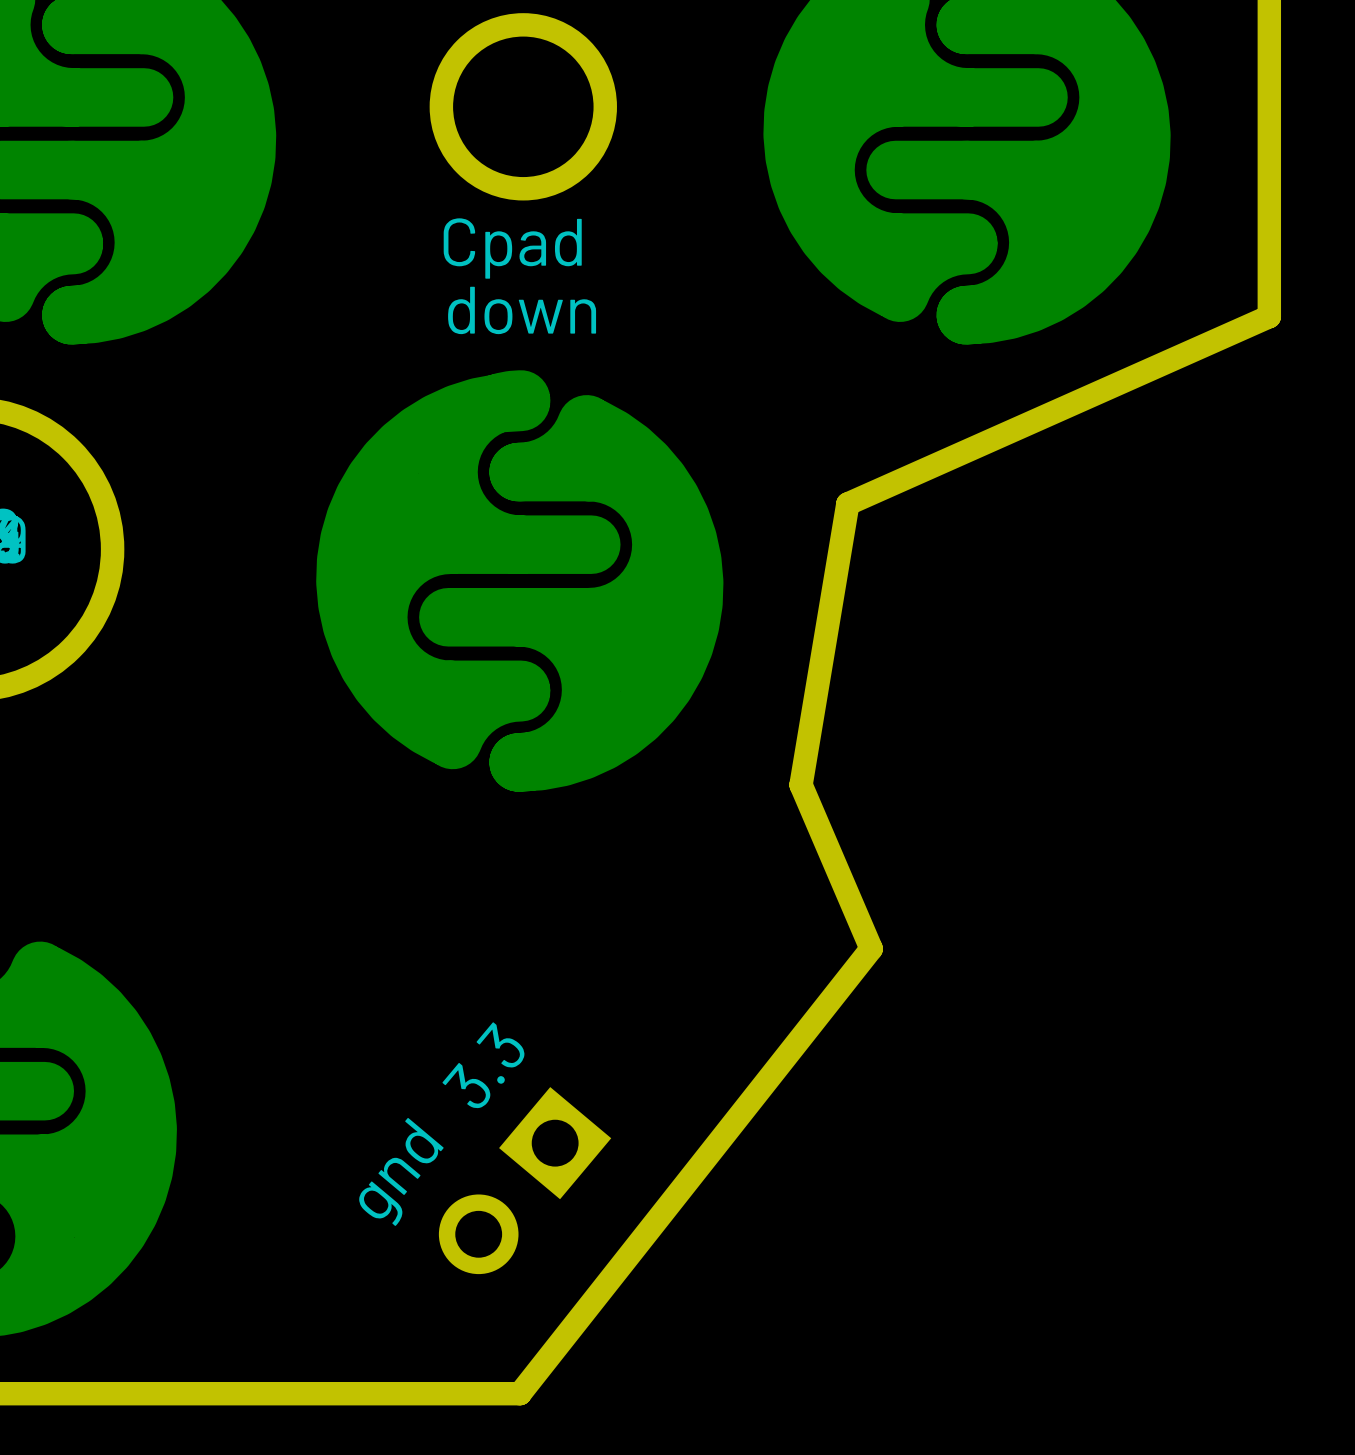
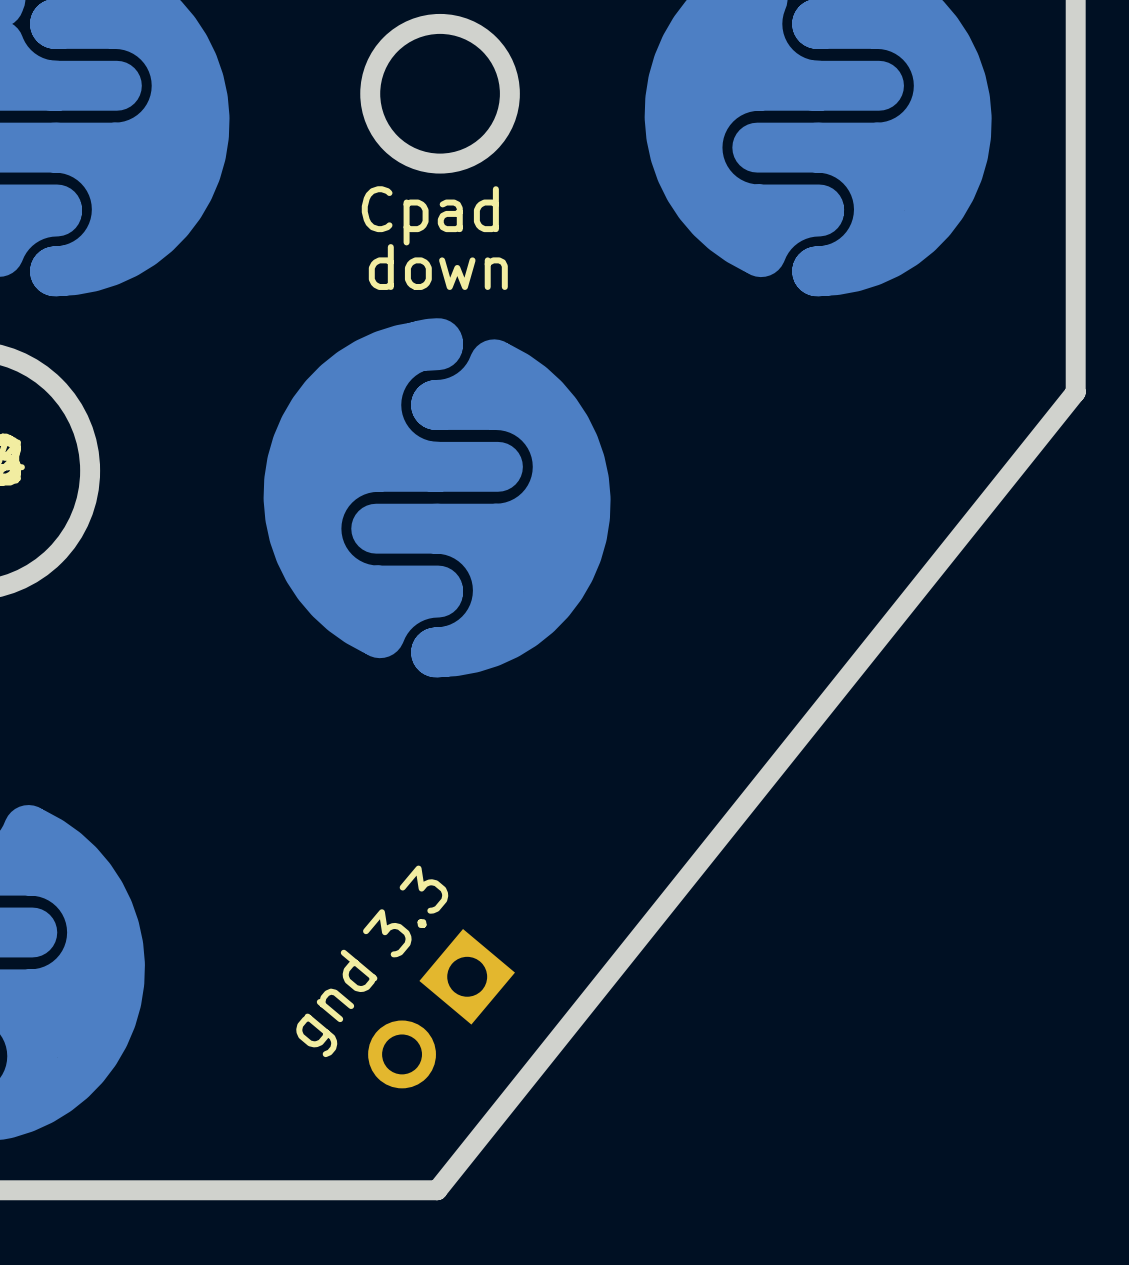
board edge: (1269, 316) (847, 503) (801, 784) (871, 948) (520, 1393) -> (1075, 272) (1075, 392) (437, 1190)

